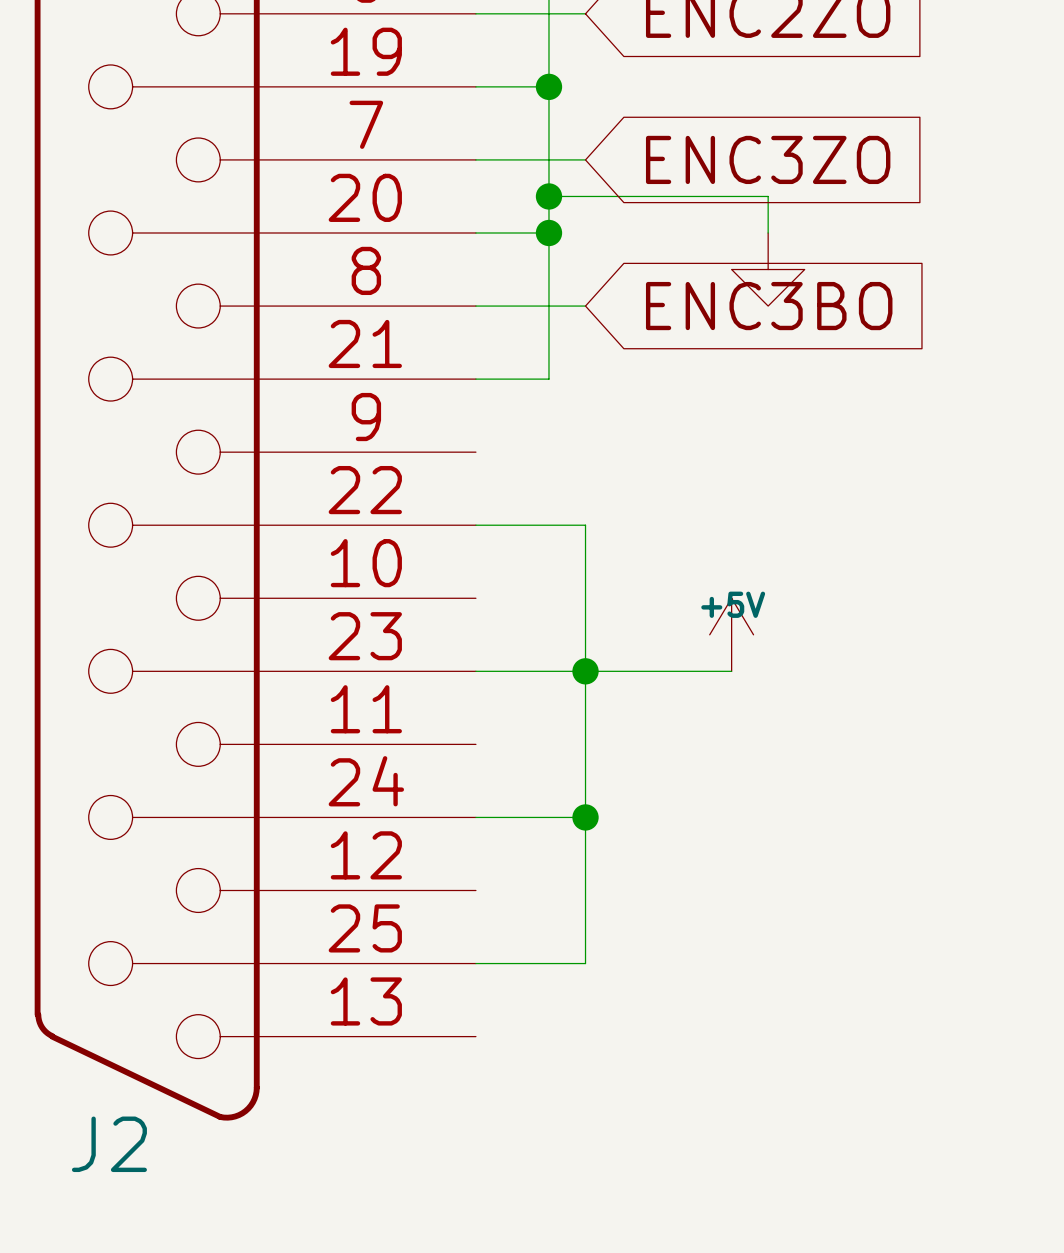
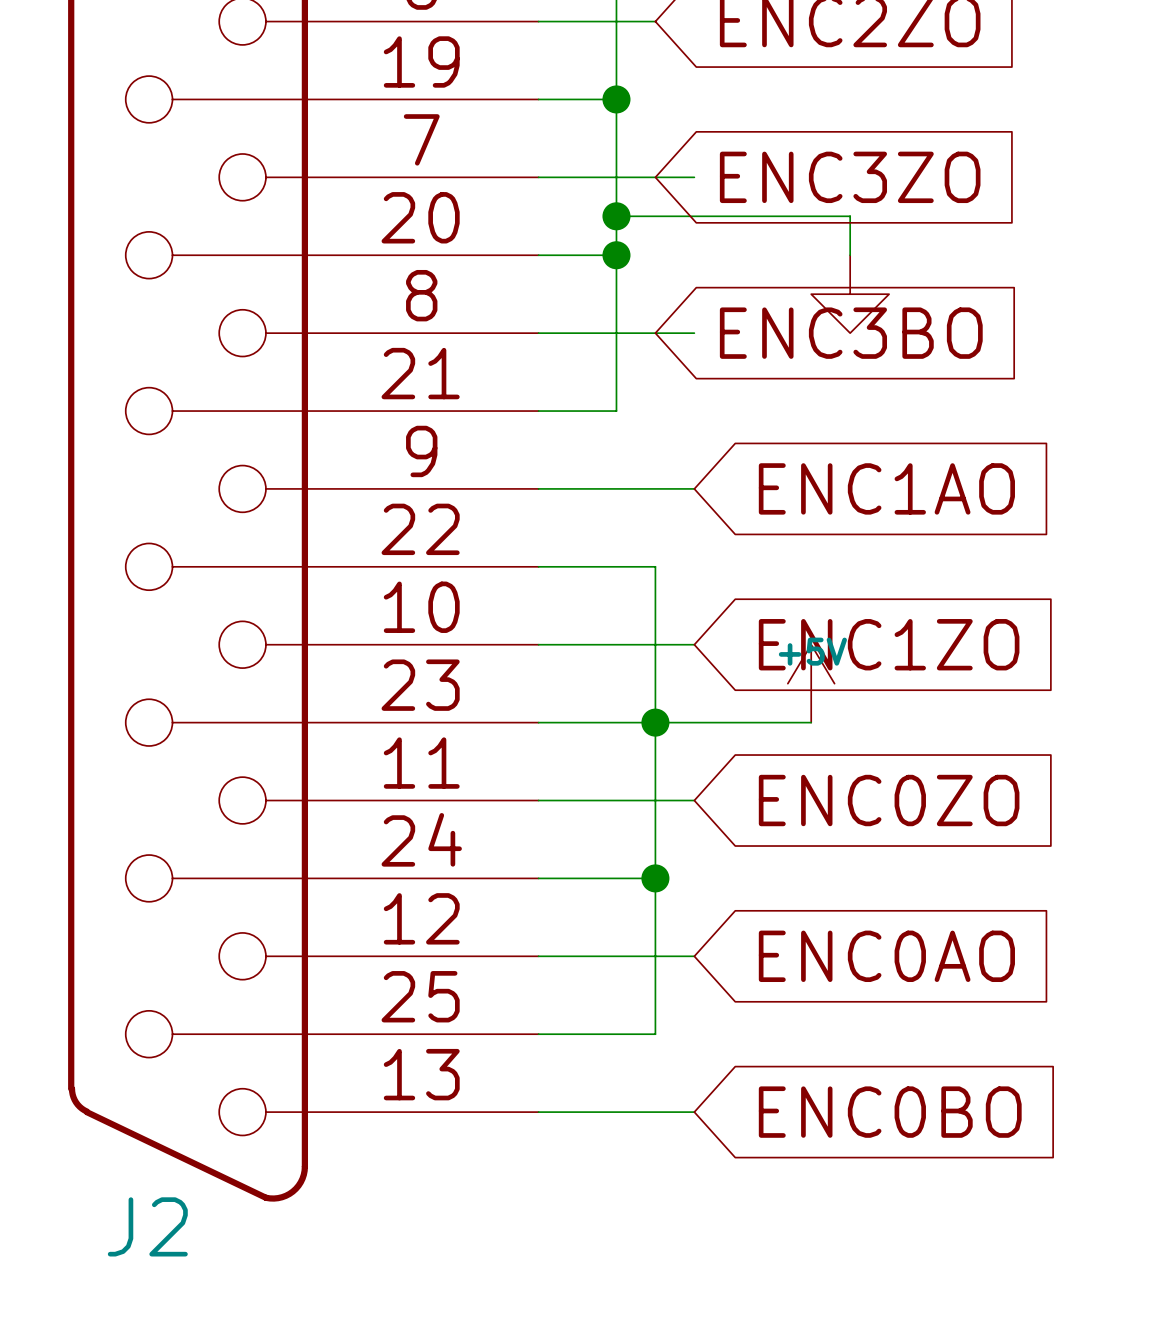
wire: none -> (655, 177) (694, 177)
wire: none -> (655, 333) (694, 333)
wire: none -> (538, 488) (694, 488)
global label: none -> ENC1AO (886, 488)
wire: none -> (538, 644) (694, 644)
global label: none -> ENC1ZO (889, 644)
wire: none -> (538, 800) (694, 800)
global label: none -> ENC0ZO (889, 800)
wire: none -> (538, 956) (694, 956)
global label: none -> ENC0AO (886, 956)
wire: none -> (538, 1112) (694, 1112)
global label: none -> ENC0BO (890, 1112)

